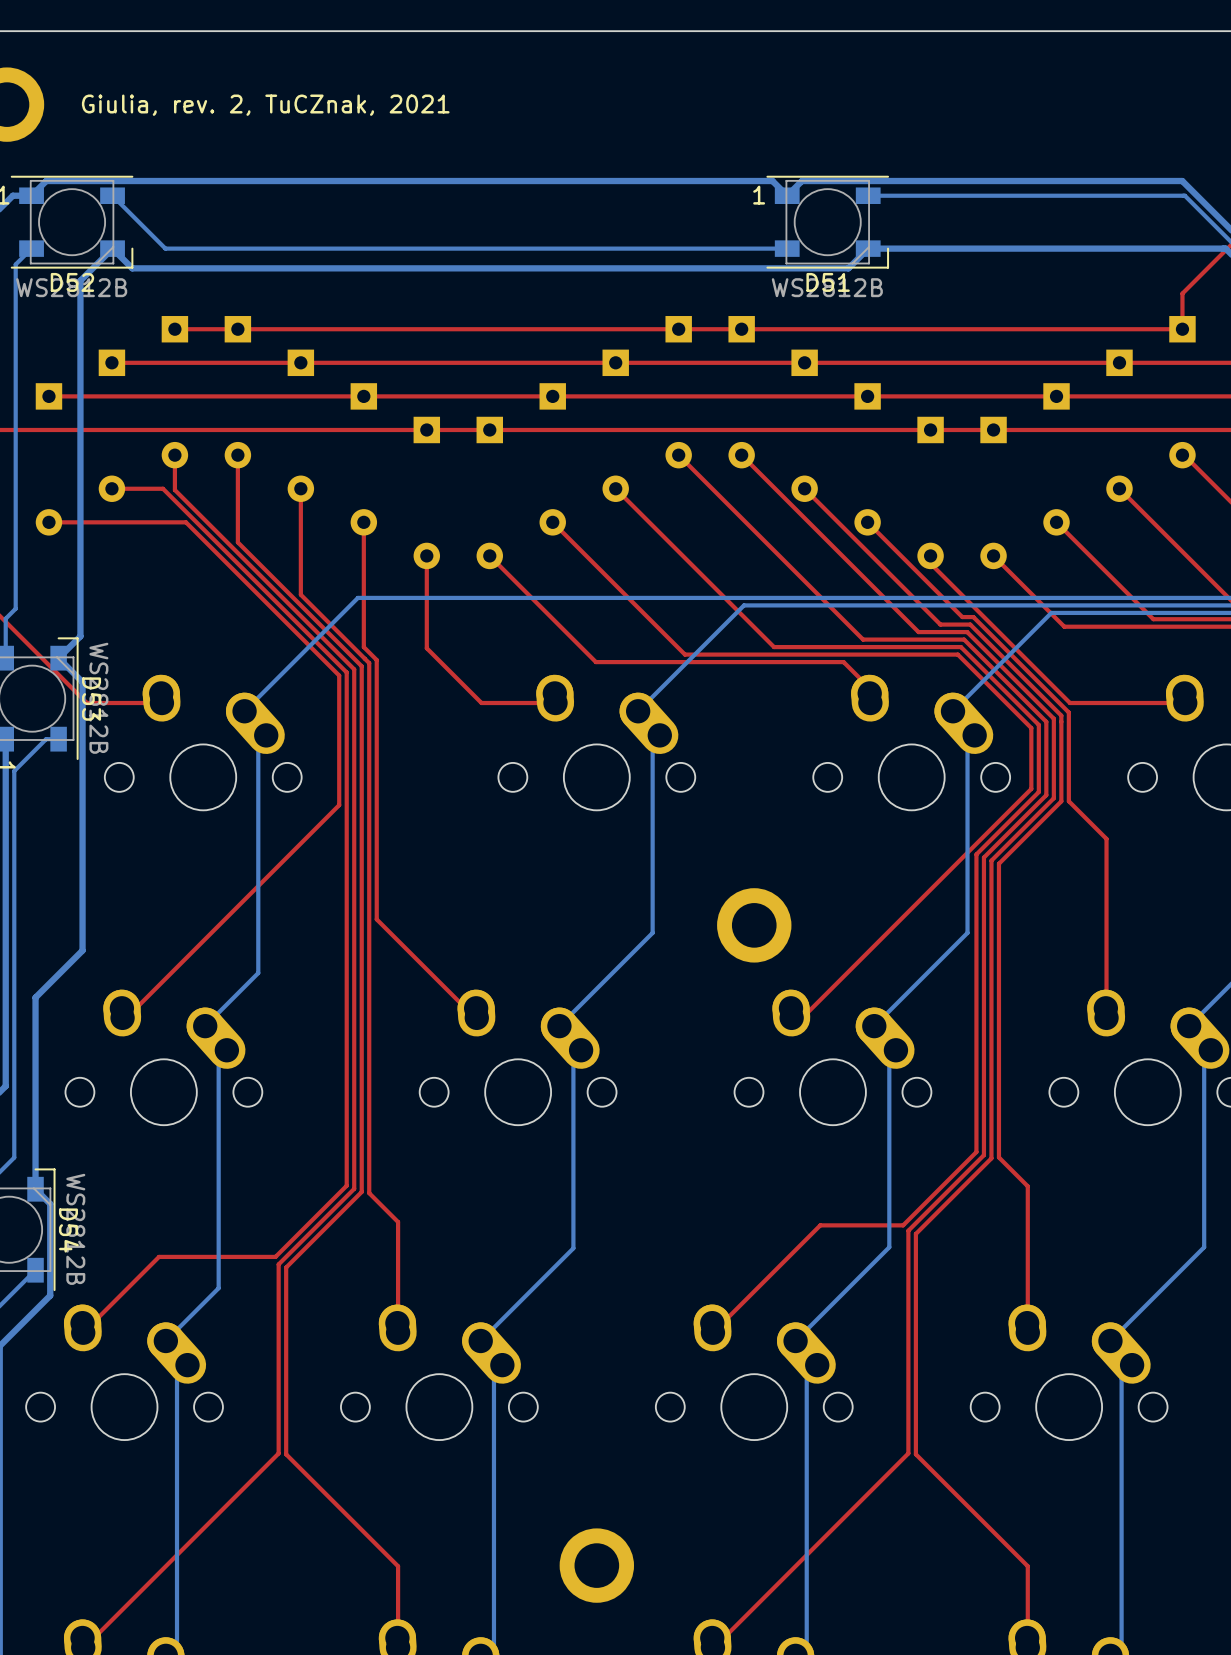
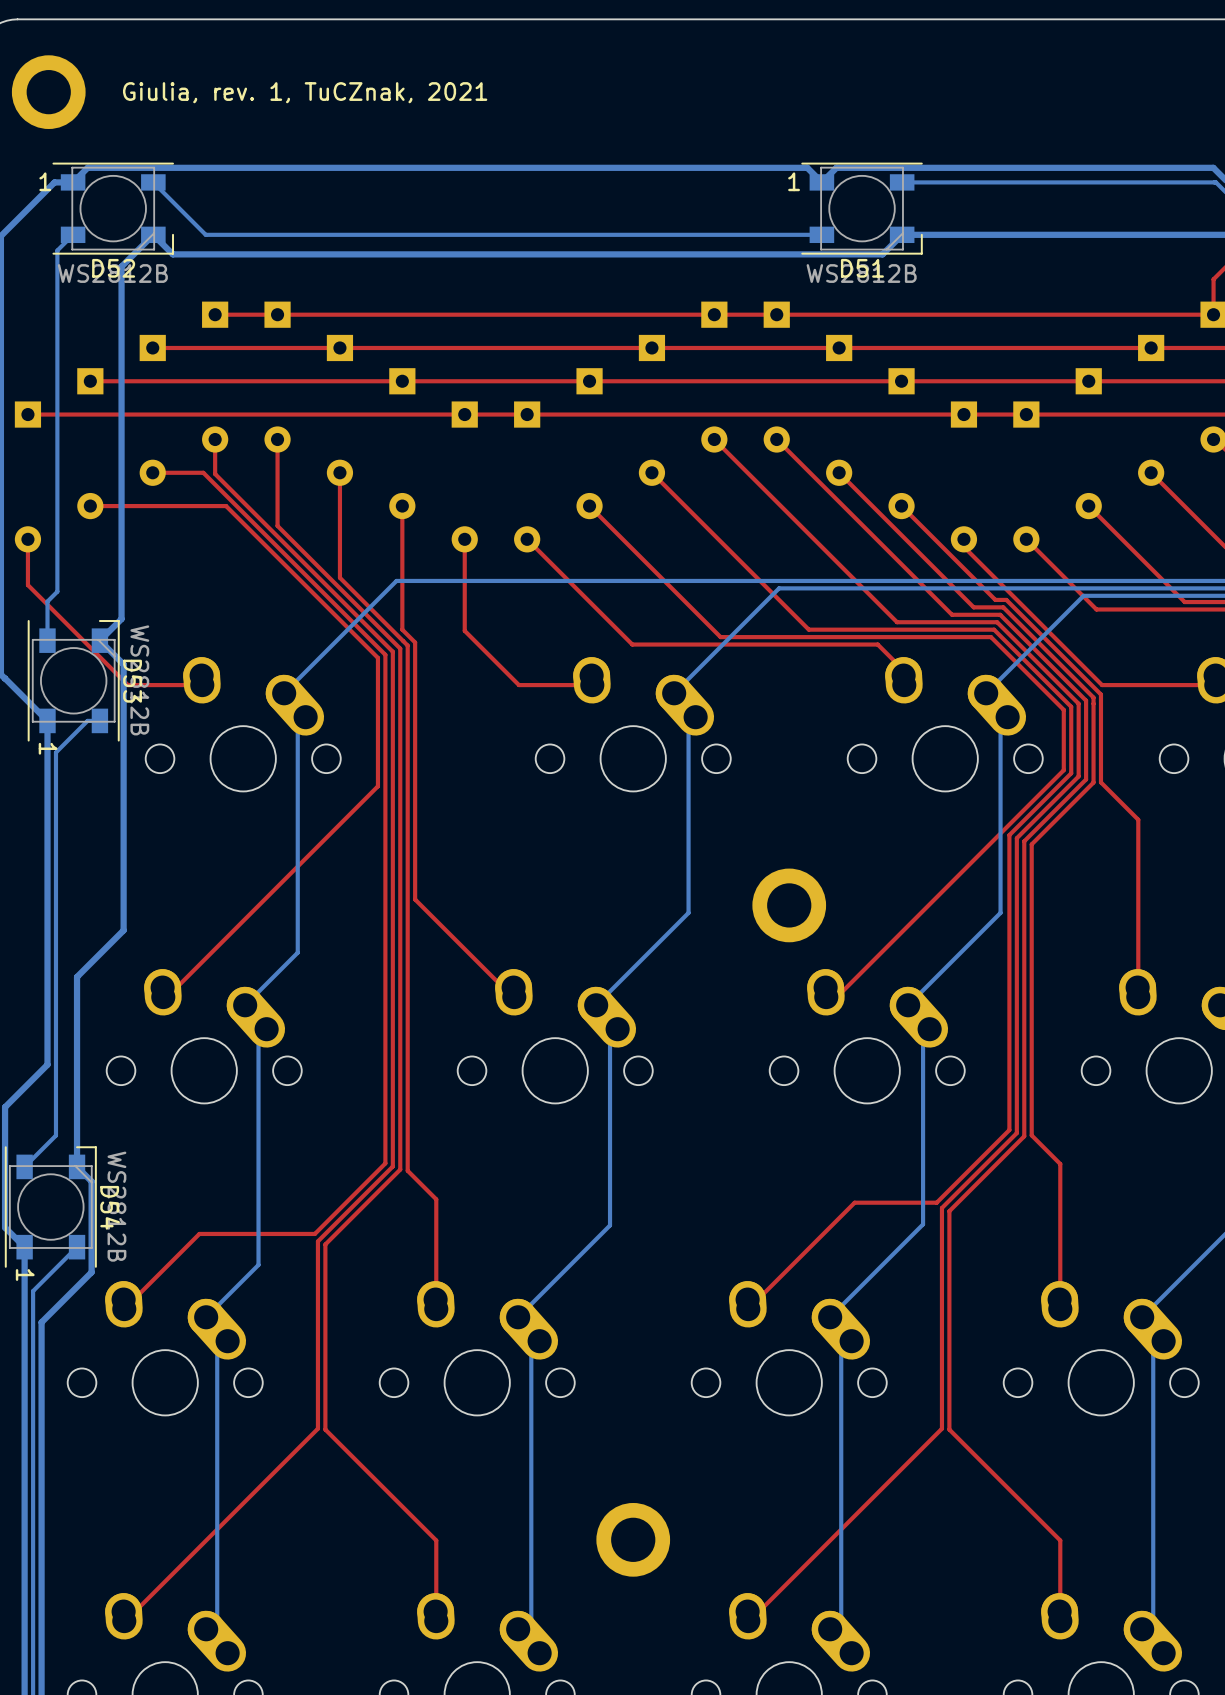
text: Giulia, rev. 2, TuCZnak, 2021 (265, 105) -> Giulia, rev. 1, TuCZnak, 2021 (305, 92)

